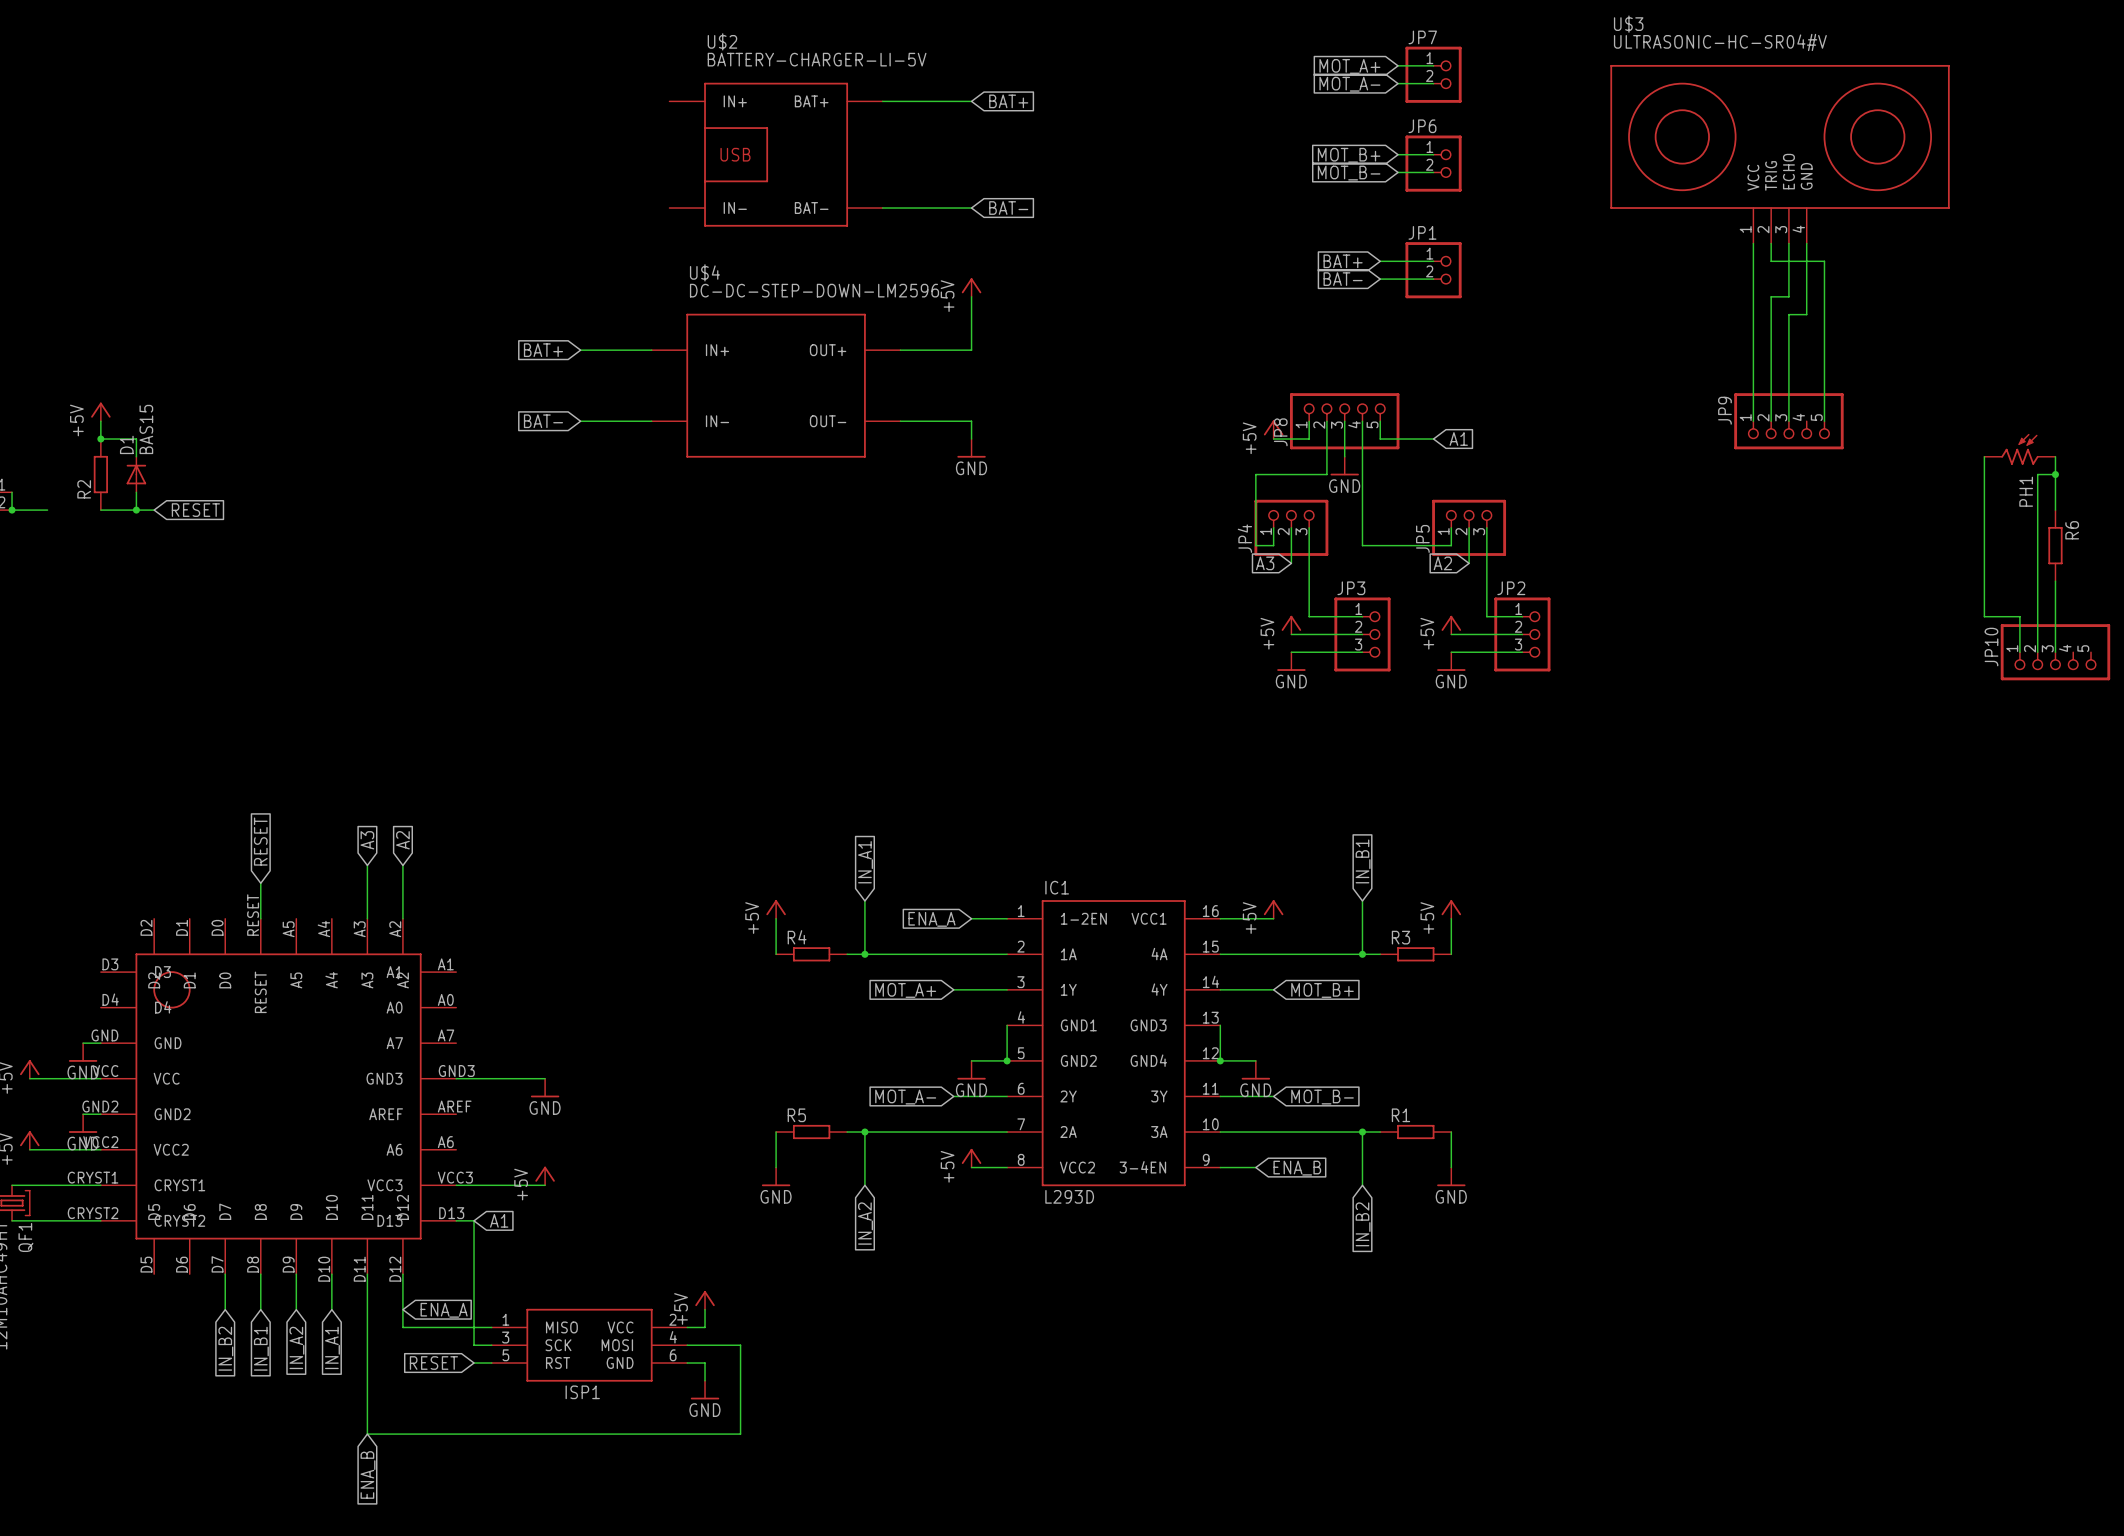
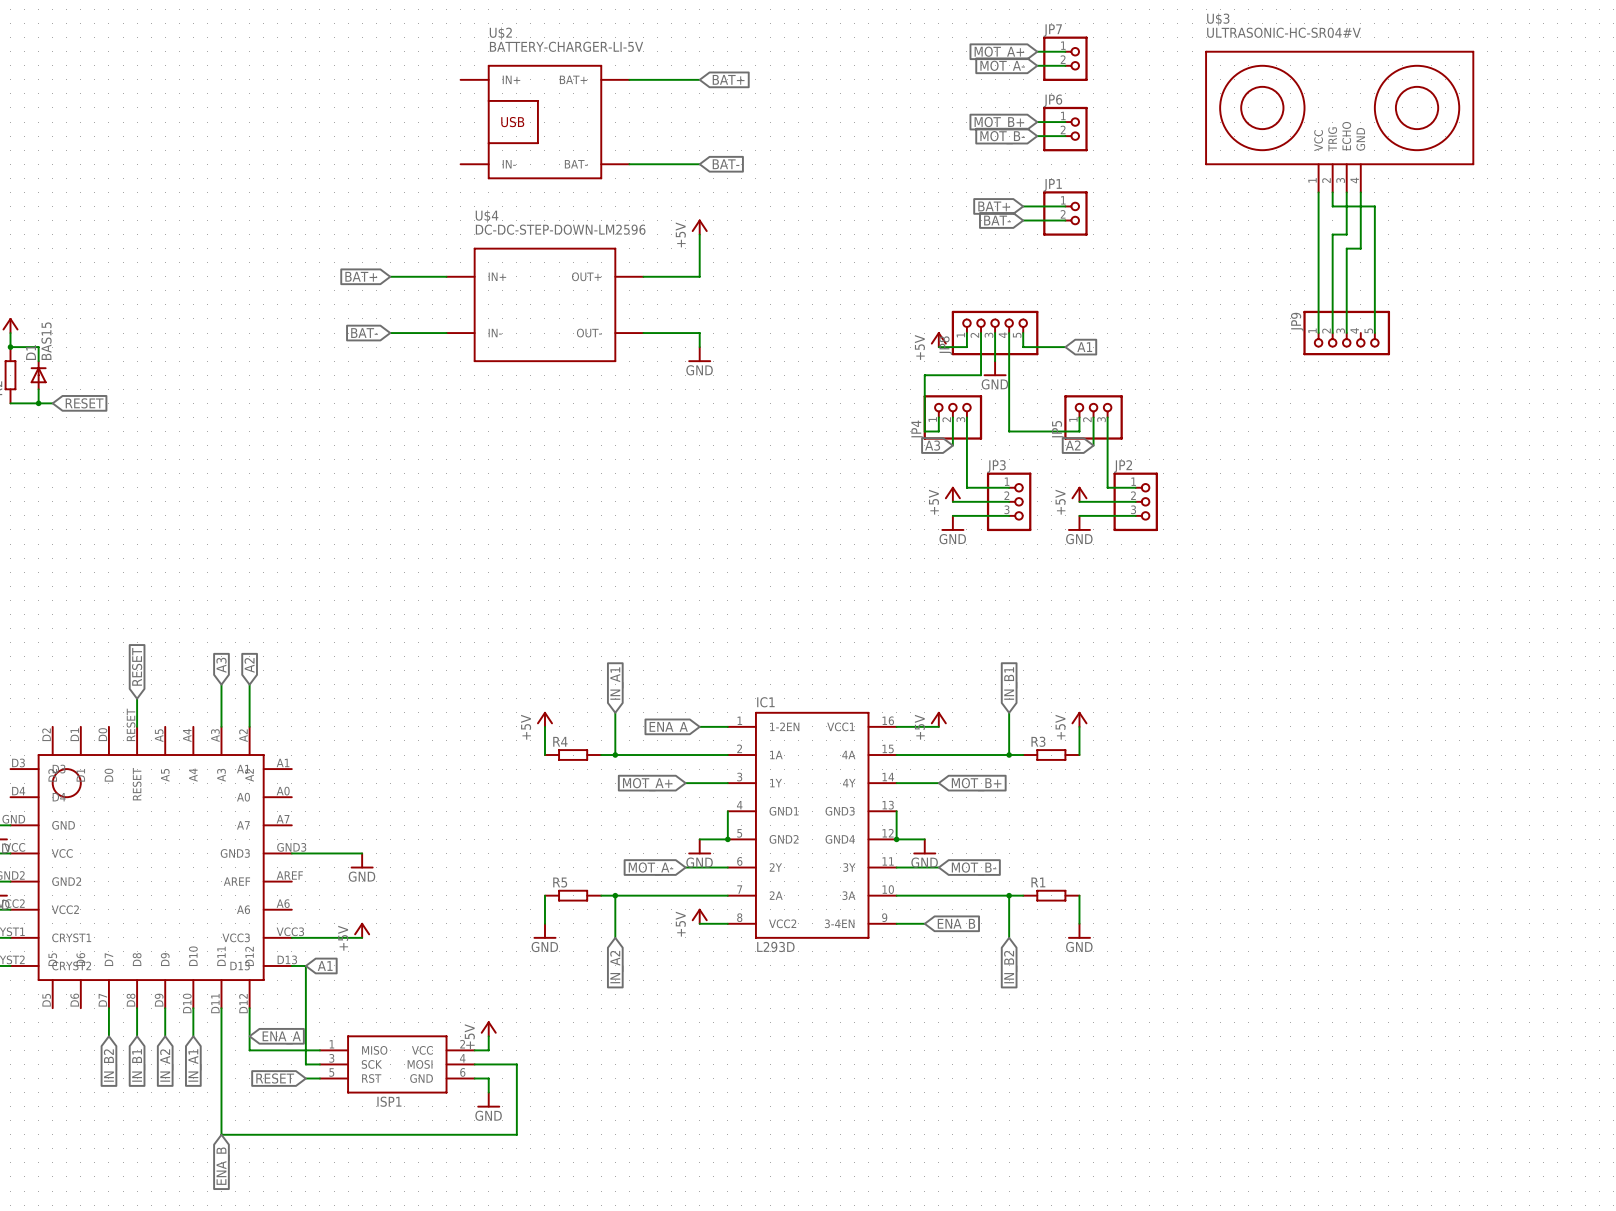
PH1: (2019, 449) -> none
wire: (1984, 456) (1984, 616) (2019, 616) (2019, 652) -> none
wire: (2055, 456) (2055, 510) -> none
wire: (2055, 474) (2037, 474) (2037, 652) -> none
junction: (2055, 474) -> none
R6: (2055, 545) -> none
wire: (2055, 581) (2055, 652) -> none
JP10: (2055, 652) -> none

